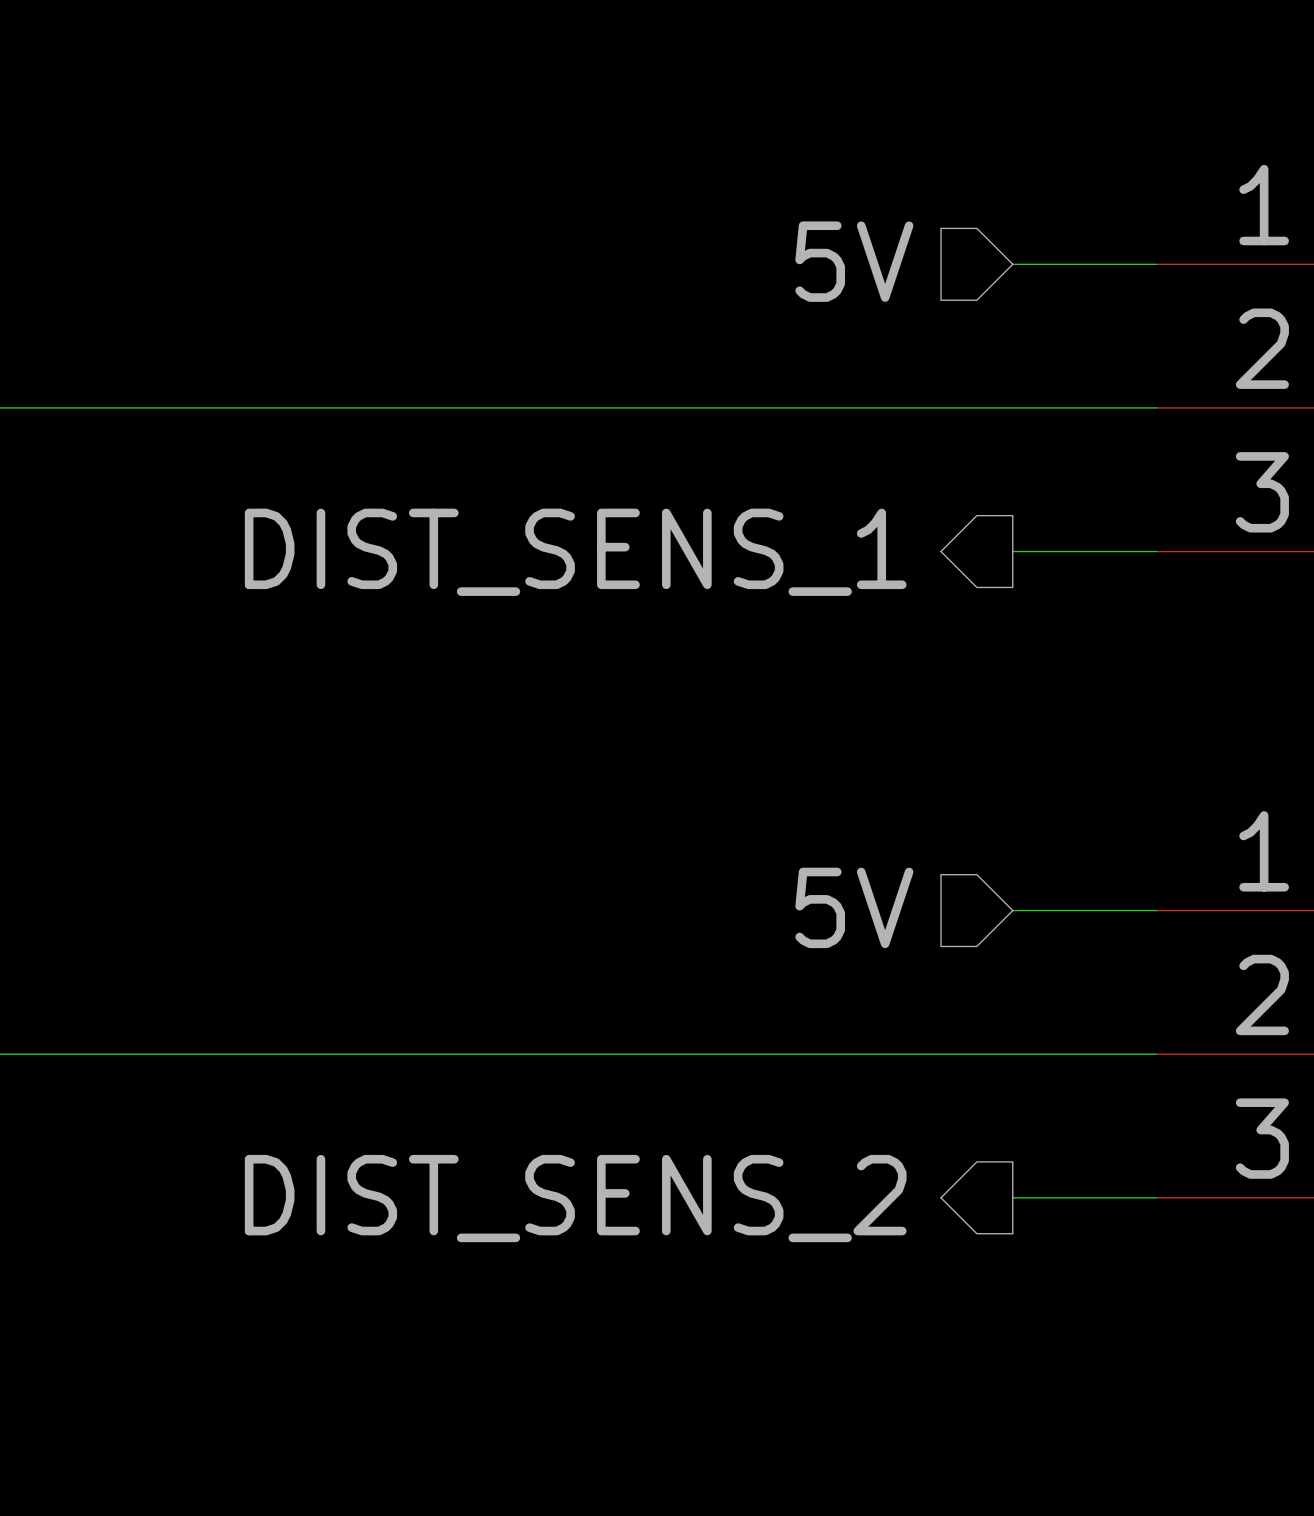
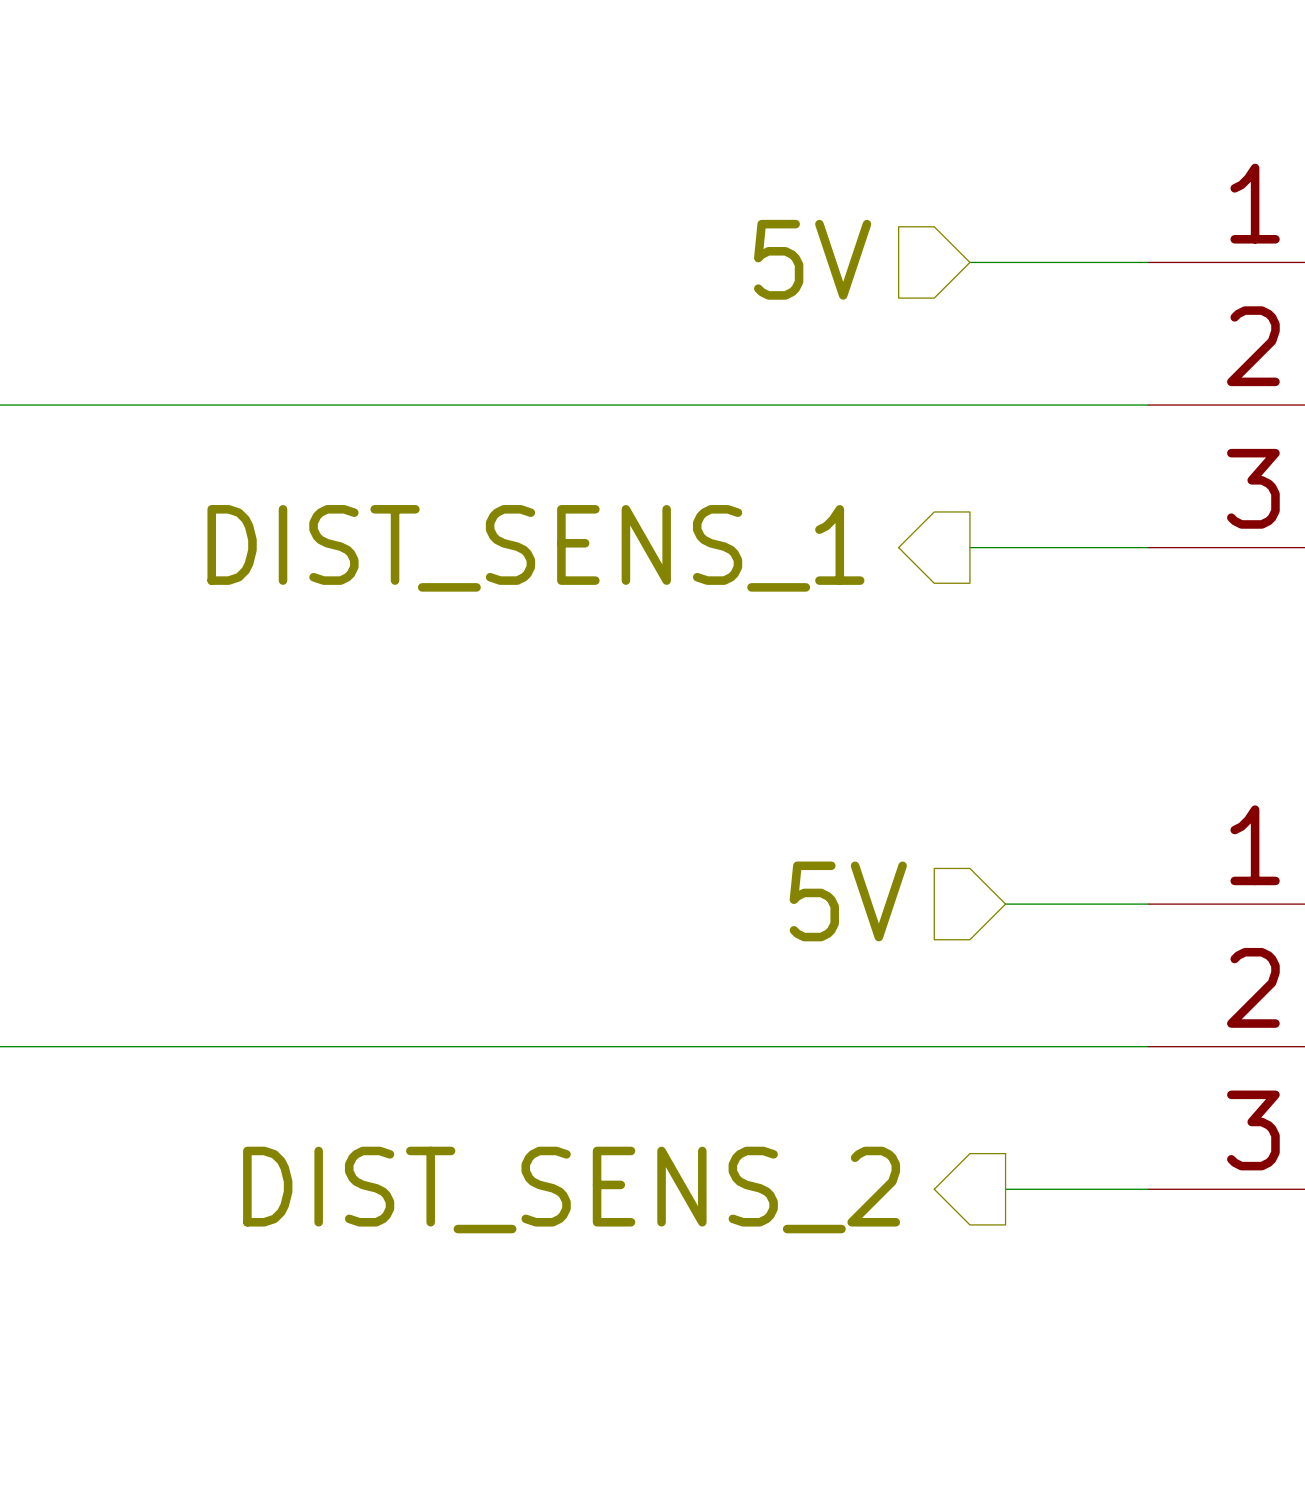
hierarchical label position: 5V (854, 261) -> 5V (812, 259)
wire: none -> (969, 262) (1005, 262)
wire: none -> (969, 547) (1005, 547)
hierarchical label position: DIST_SENS_1 (575, 552) -> DIST_SENS_1 (535, 548)

